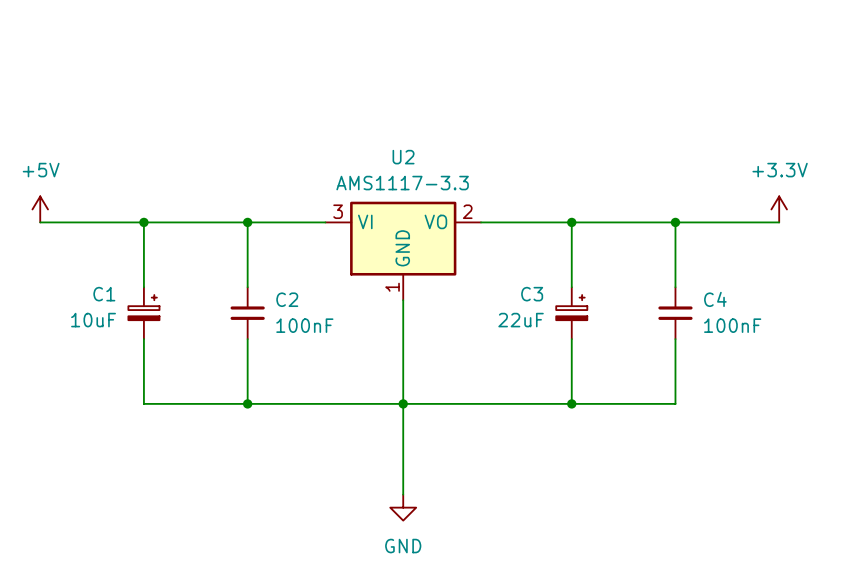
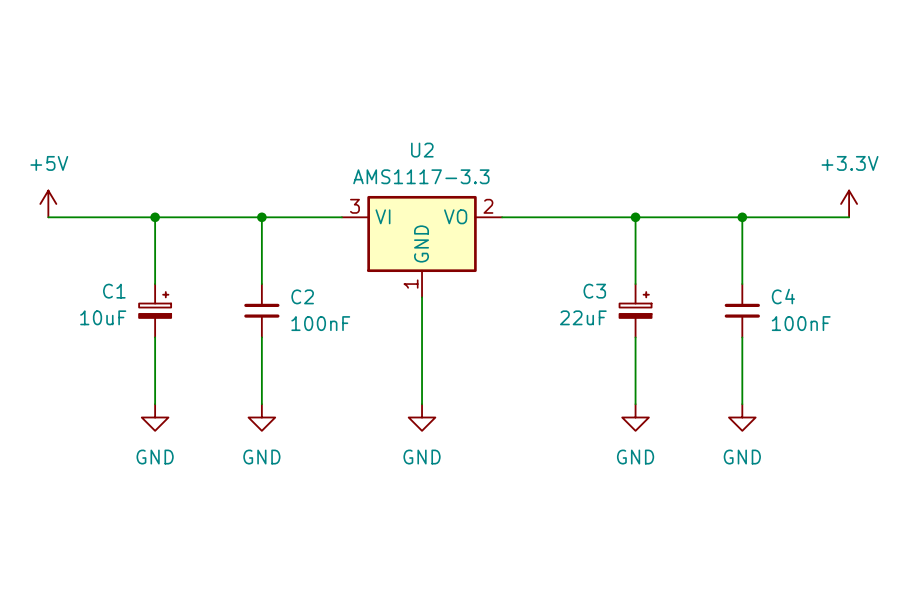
power symbol position: +3.3V (779, 209) -> +3.3V (849, 203)
wire: (571, 222) (571, 287) -> (635, 217) (635, 284)
junction: (571, 222) -> none
junction: none -> (635, 217)
wire: (675, 222) (675, 287) -> (742, 217) (742, 284)
junction: (675, 222) -> none
junction: none -> (742, 217)
wire: none -> (809, 217) (849, 217)
C3 position: (571, 313) -> (635, 310)
C4 position: (675, 313) -> (742, 310)
wire: (571, 339) (571, 403) -> (635, 337) (635, 404)
wire: (675, 339) (675, 403) (143, 403) -> none
wire: none -> (742, 337) (742, 404)
junction: (247, 403) -> none
wire: (403, 403) (403, 494) -> none
junction: (403, 403) -> none
junction: (571, 403) -> none
power symbol: none -> GND (155, 417)
power symbol: none -> GND (261, 417)
power symbol: none -> GND (422, 417)
power symbol: none -> GND (635, 417)
power symbol: none -> GND (742, 417)
power symbol: GND (403, 507) -> none

